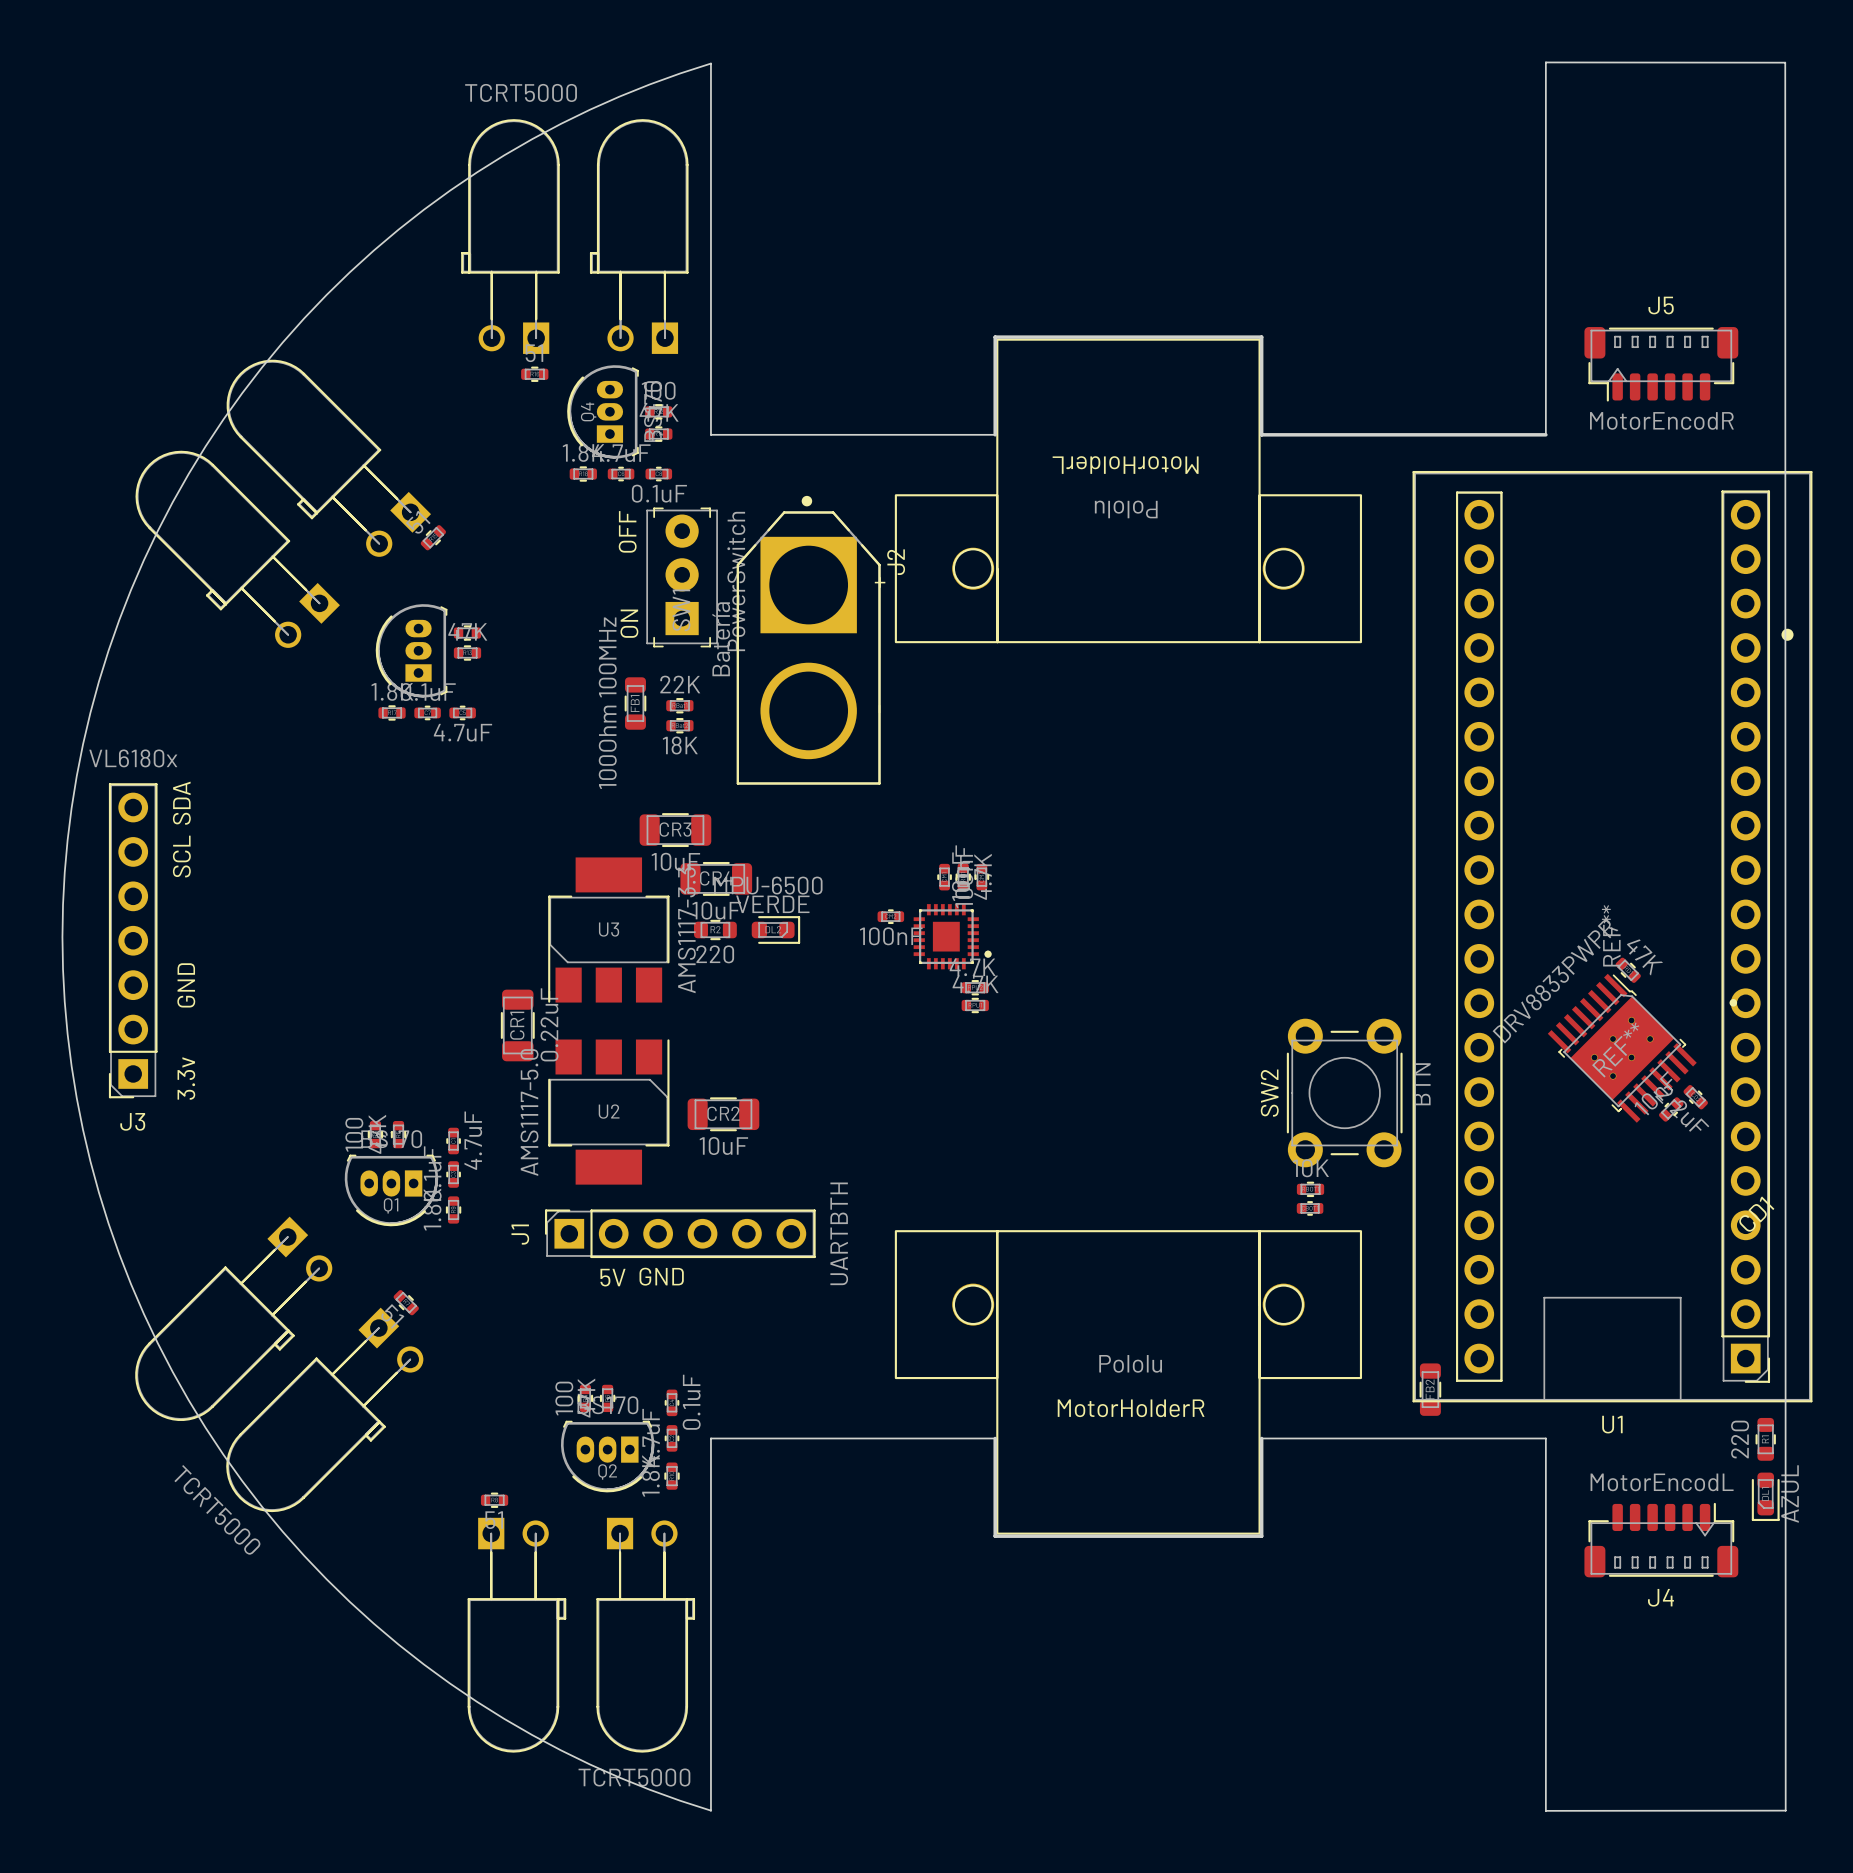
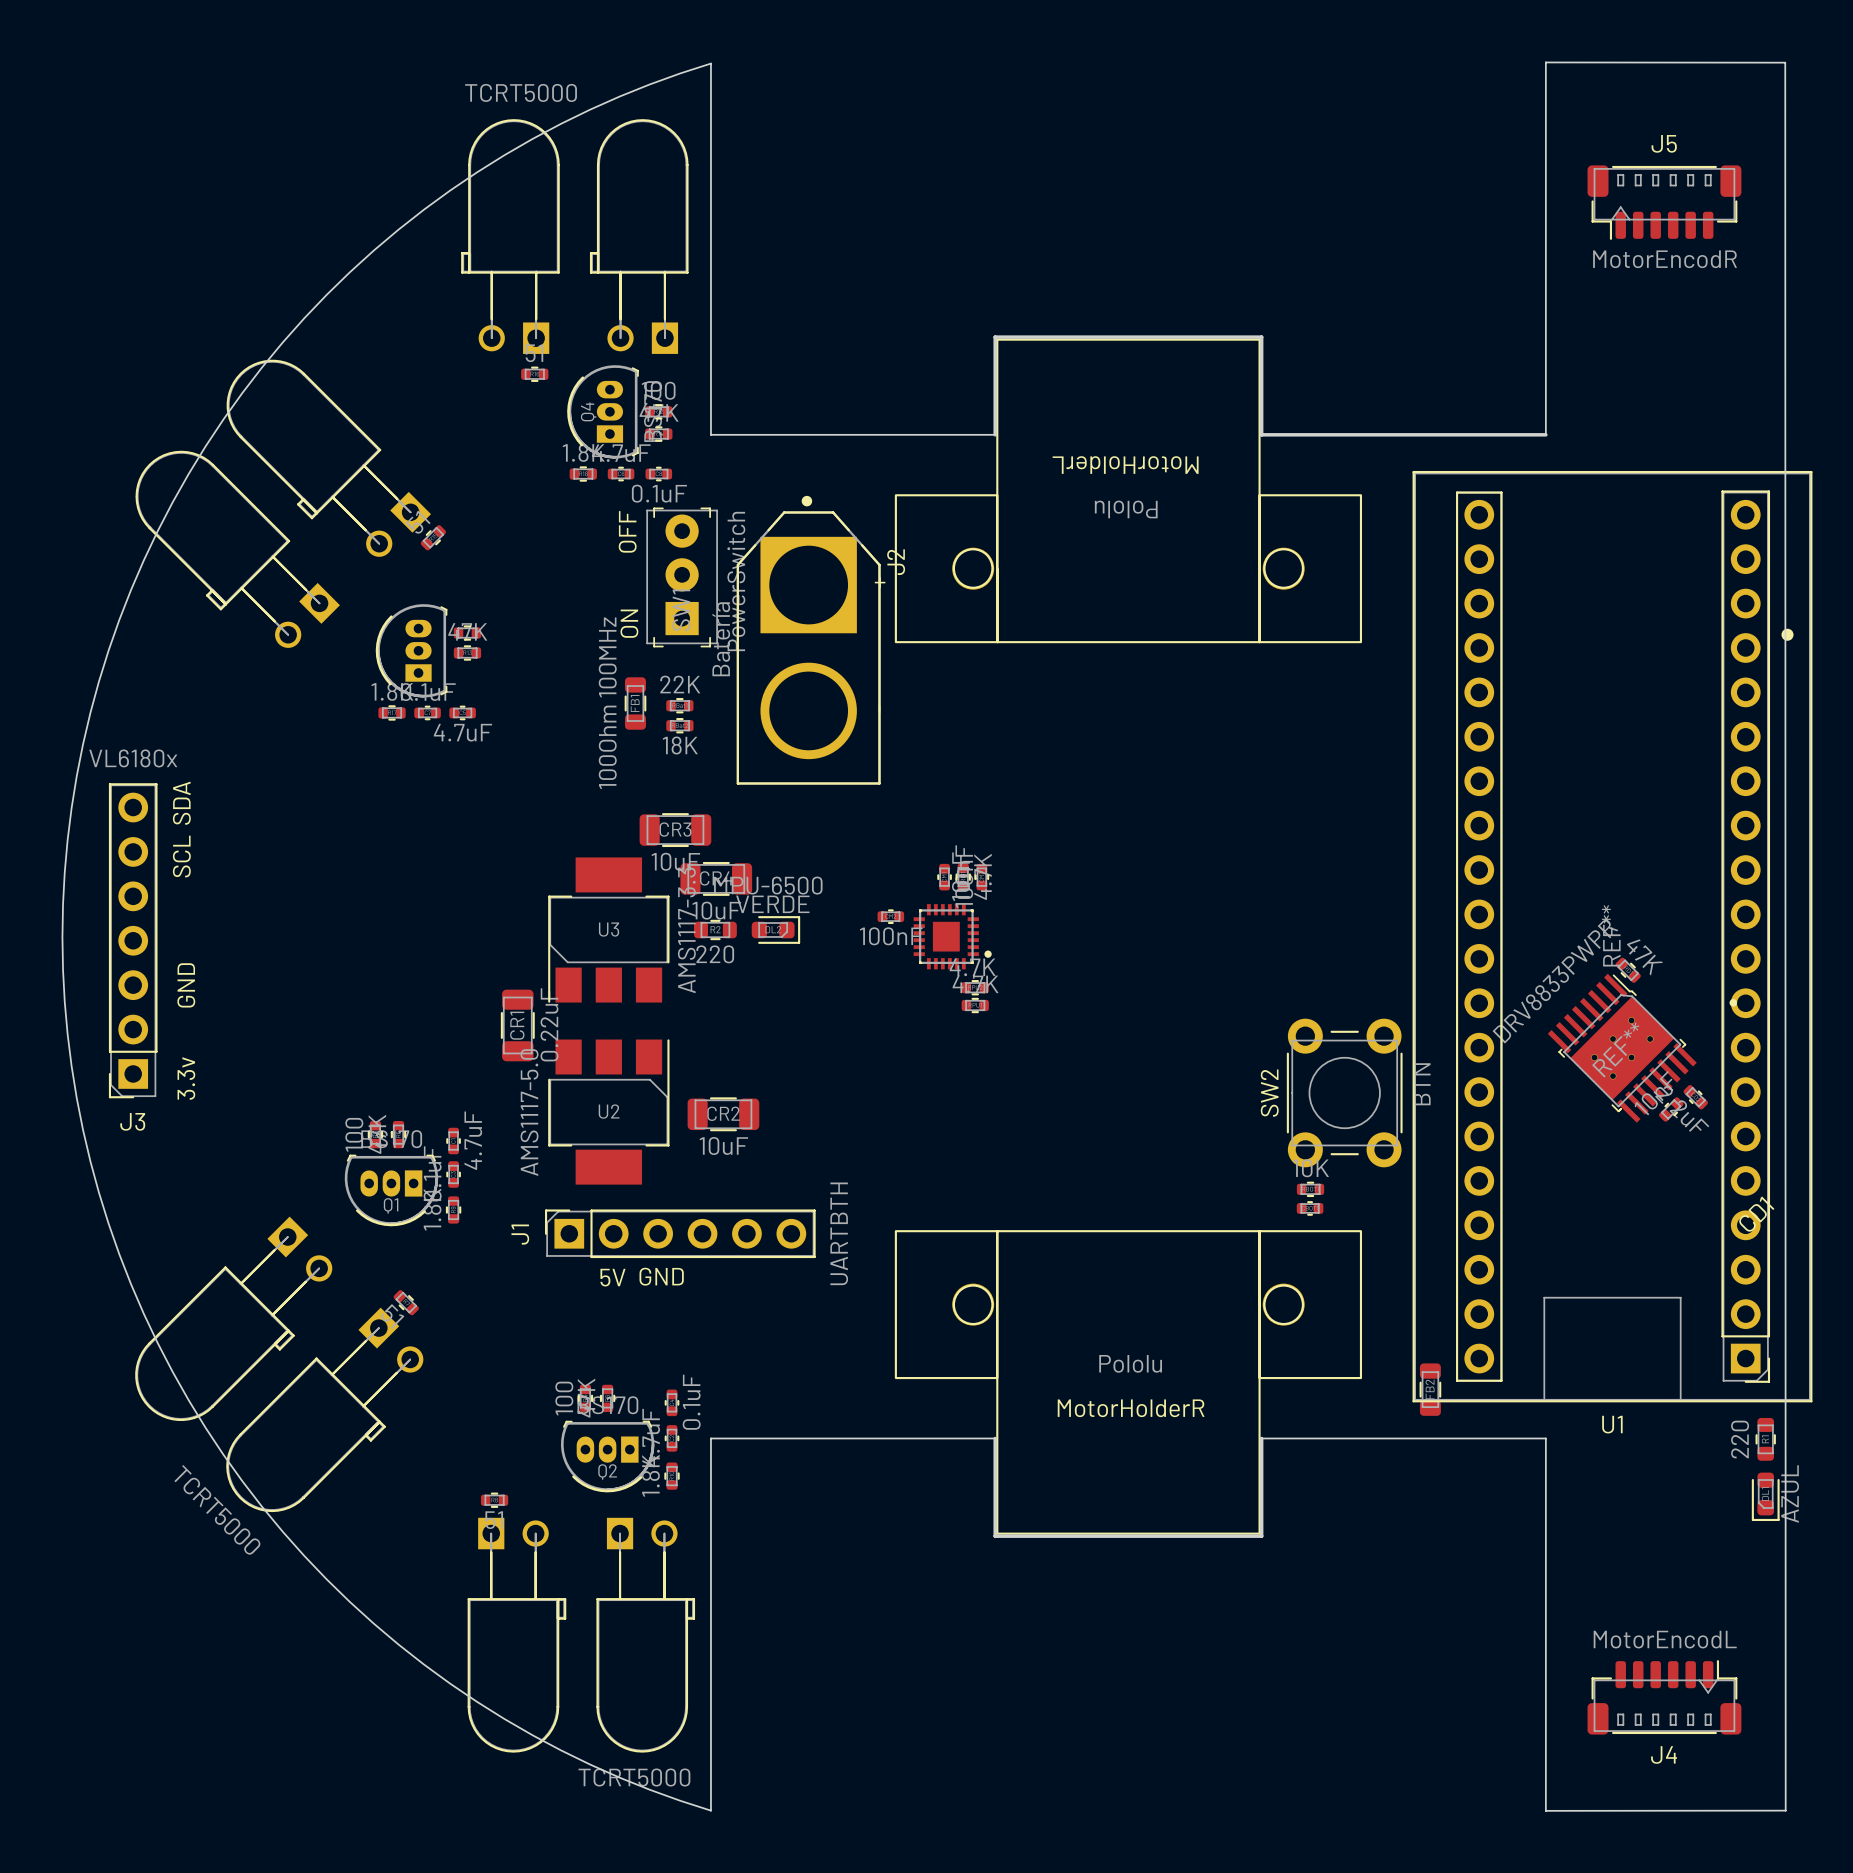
J5 position: (1661, 364) -> (1664, 202)
J4 position: (1661, 1540) -> (1664, 1697)

